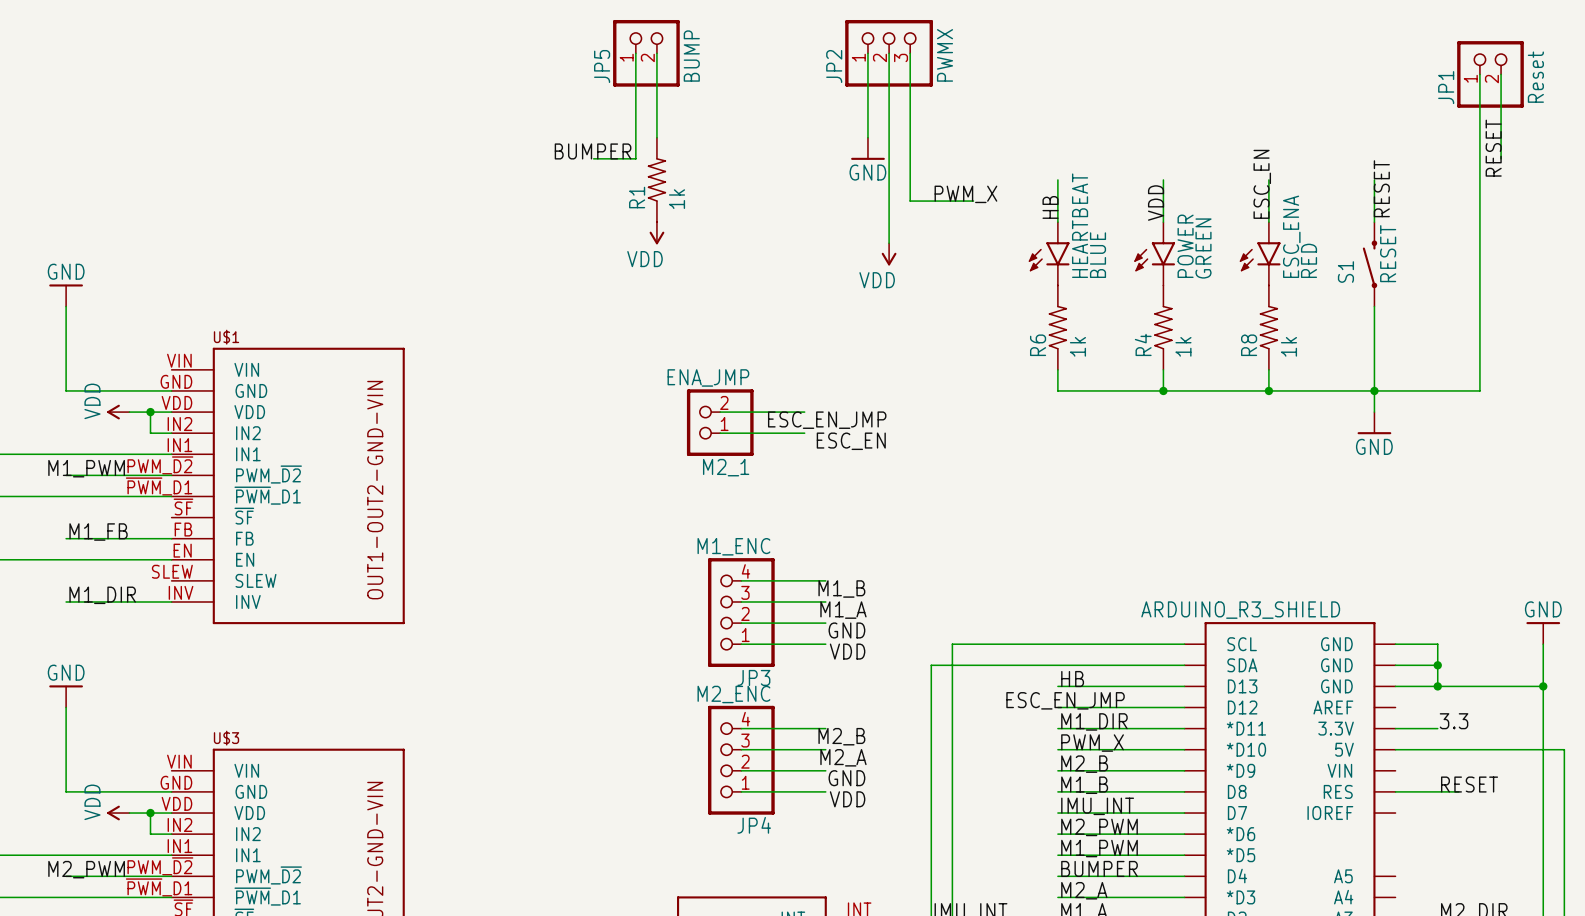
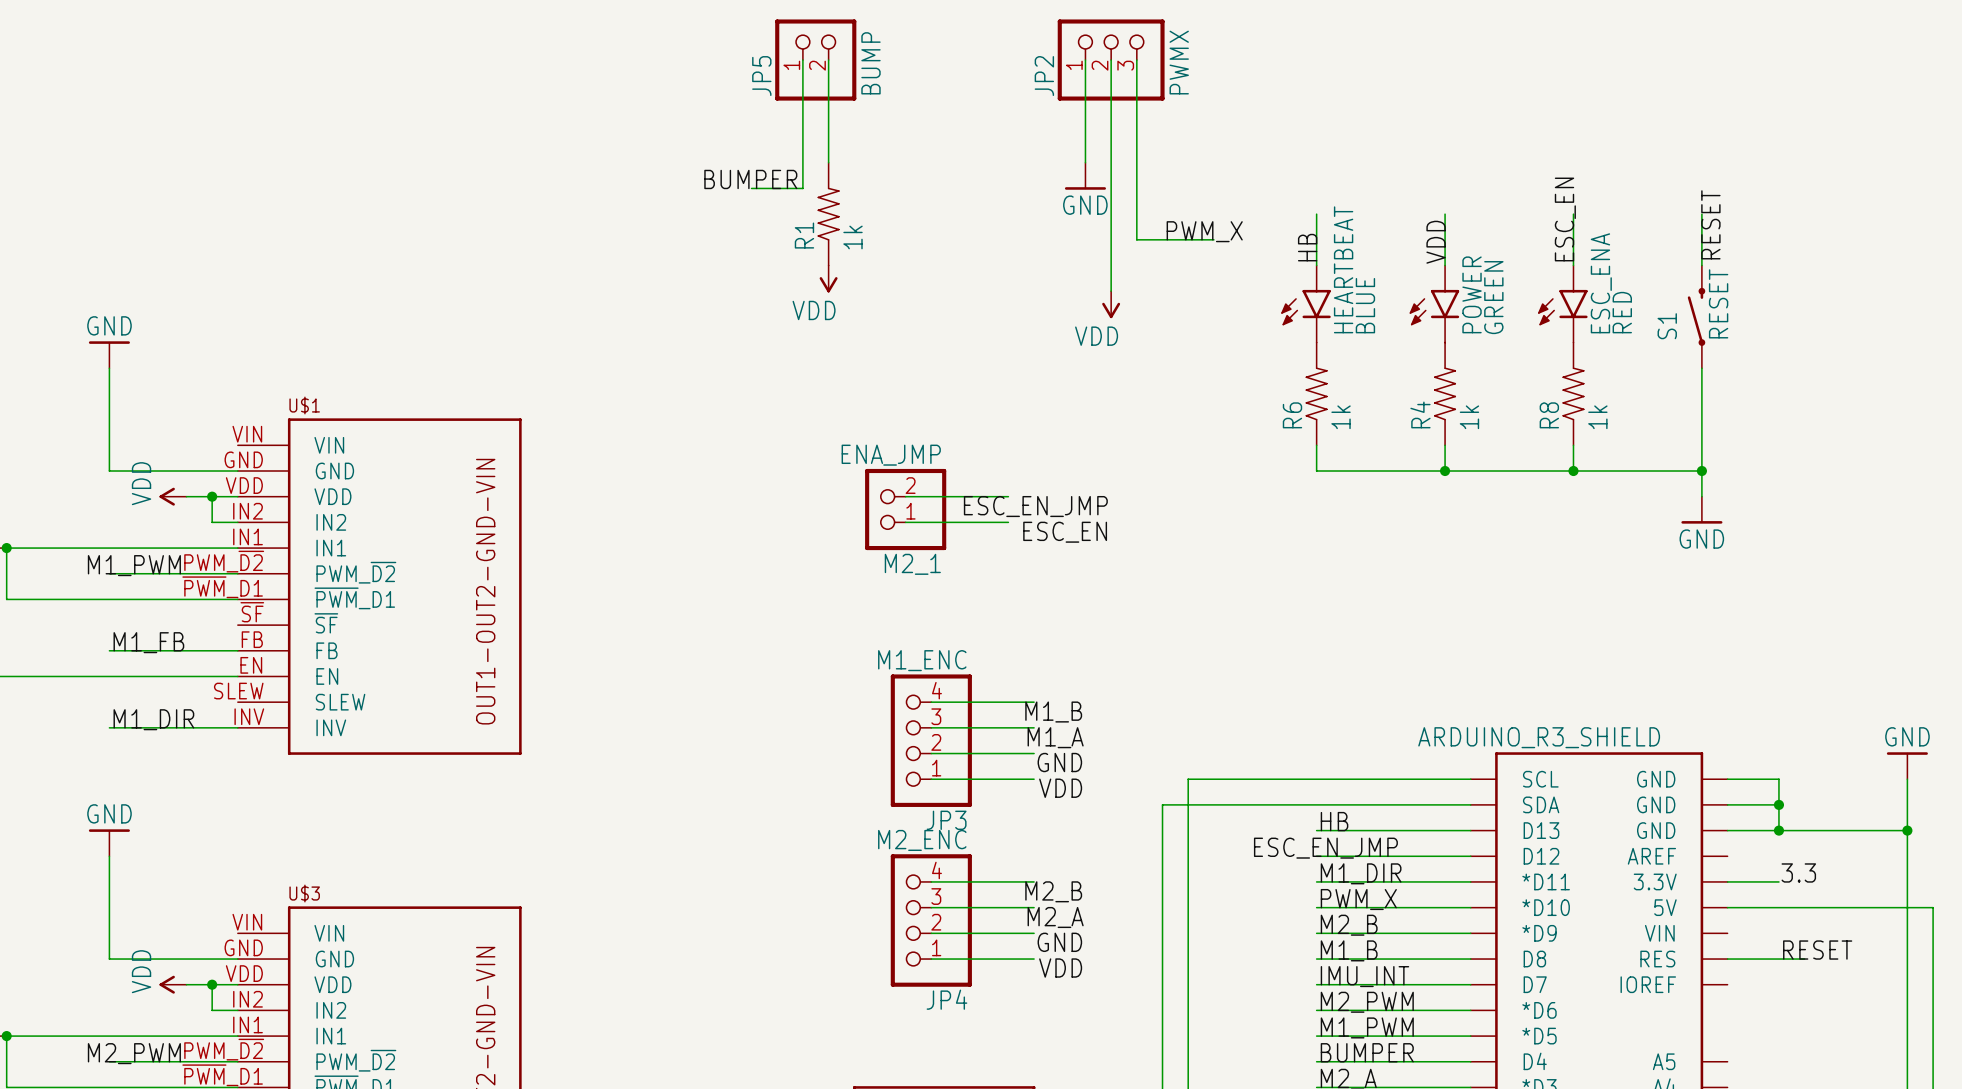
wire: (1479, 74) (1479, 390) (1374, 390) -> none
JP1: Reset (1490, 74) -> none
wire: (1501, 74) (1501, 158) -> none
label: RESET (1493, 148) -> none

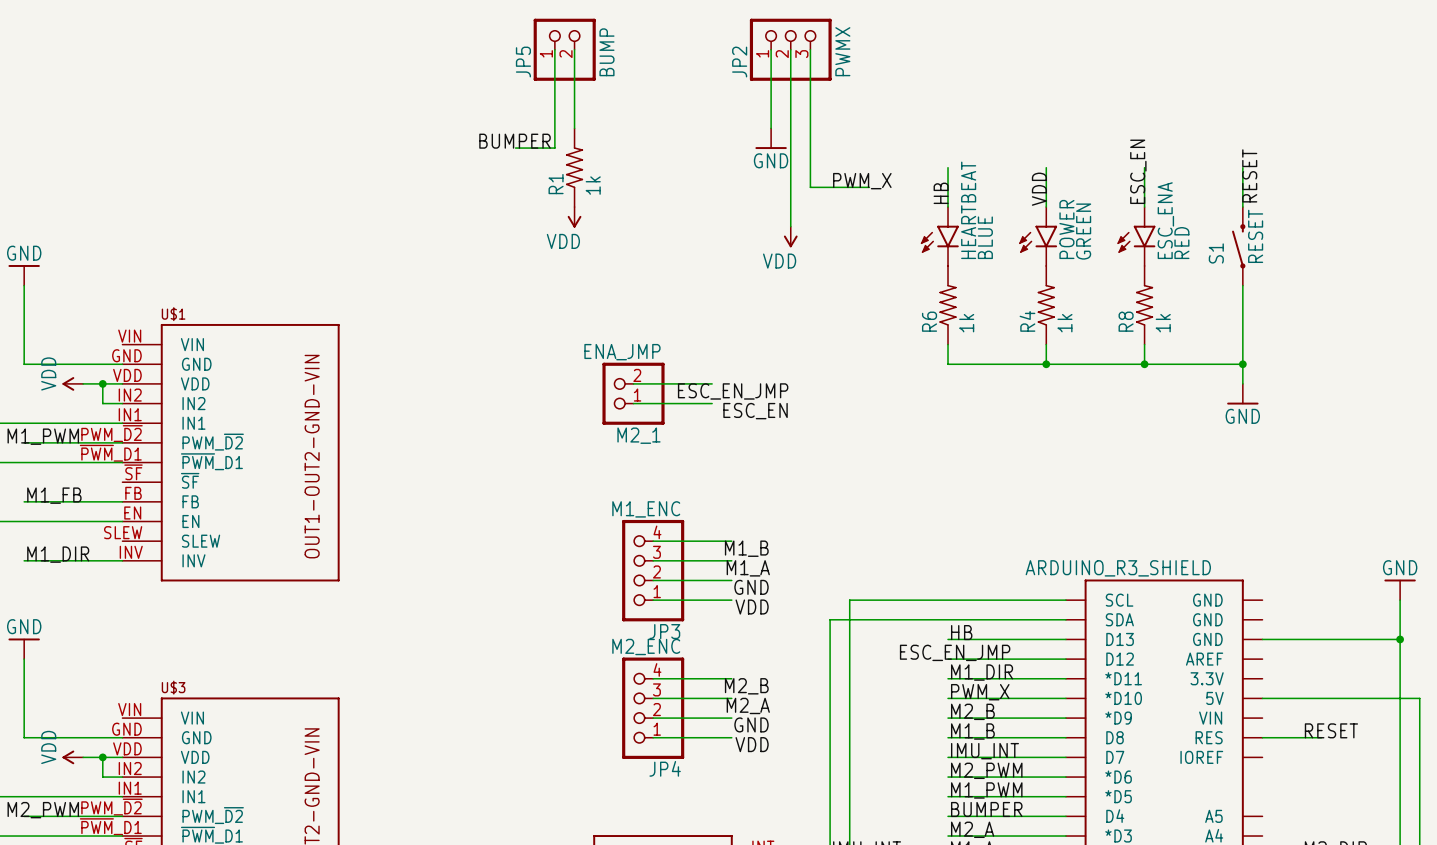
wire: (1727, 779) (1778, 779) (1778, 830) -> none
wire: (1727, 804) (1778, 804) -> none
junction: (1778, 804) -> none
junction: (1778, 830) -> none
label: 3.3 (1798, 872) -> none
wire: (1727, 881) (1778, 881) -> none

